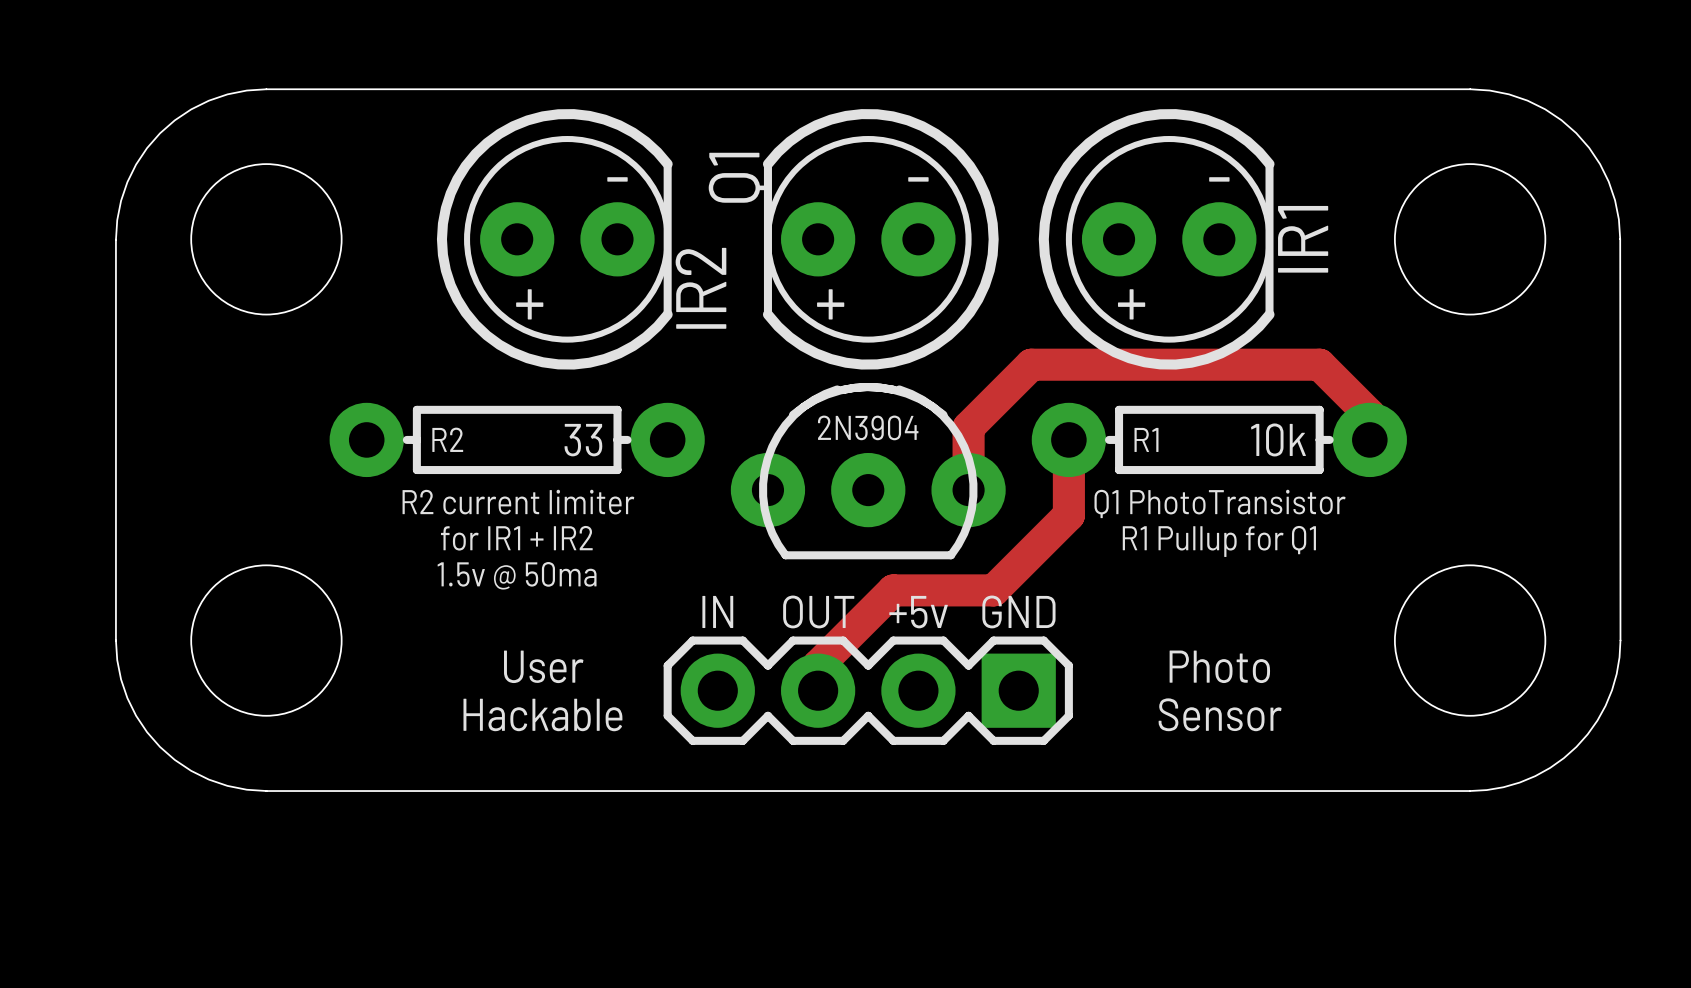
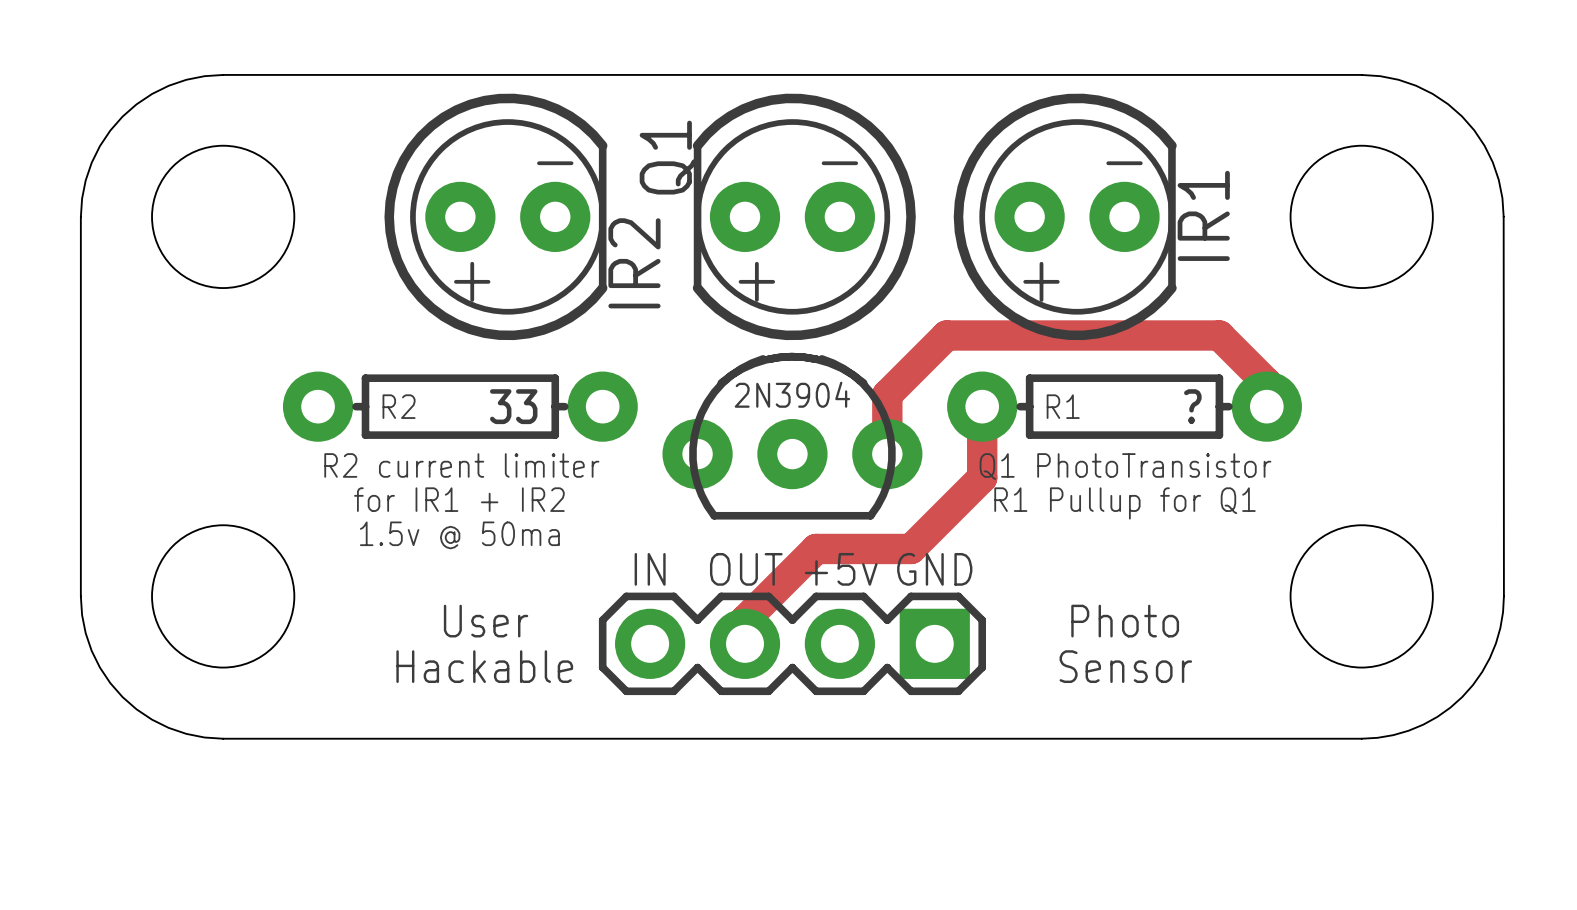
R1 value: 10k (1278, 439) -> ? (1192, 406)

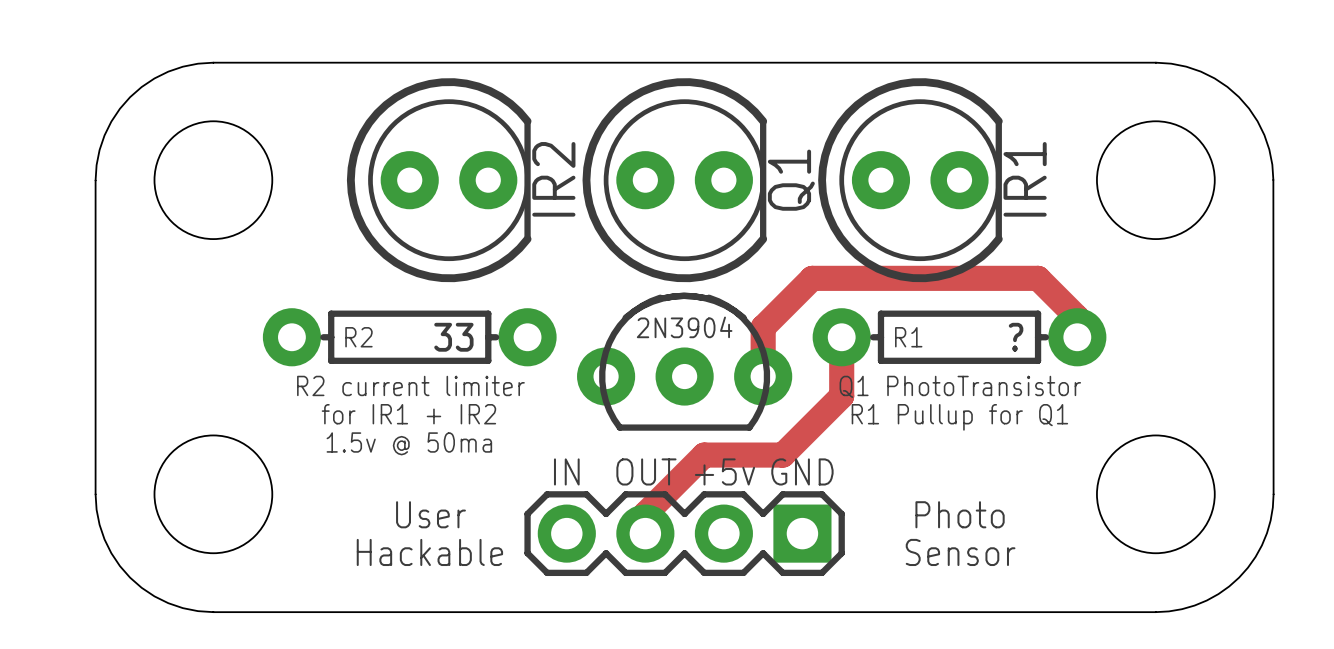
text: - (555, 163) -> none
text: - (839, 163) -> none
text: - (1124, 163) -> none
Q1 rotation: 0° (804, 216) -> 180° (674, 180)
IR2 name position: IR2 (634, 263) -> IR2 (553, 179)
text: + (472, 281) -> none
text: + (756, 281) -> none
text: + (1041, 281) -> none

